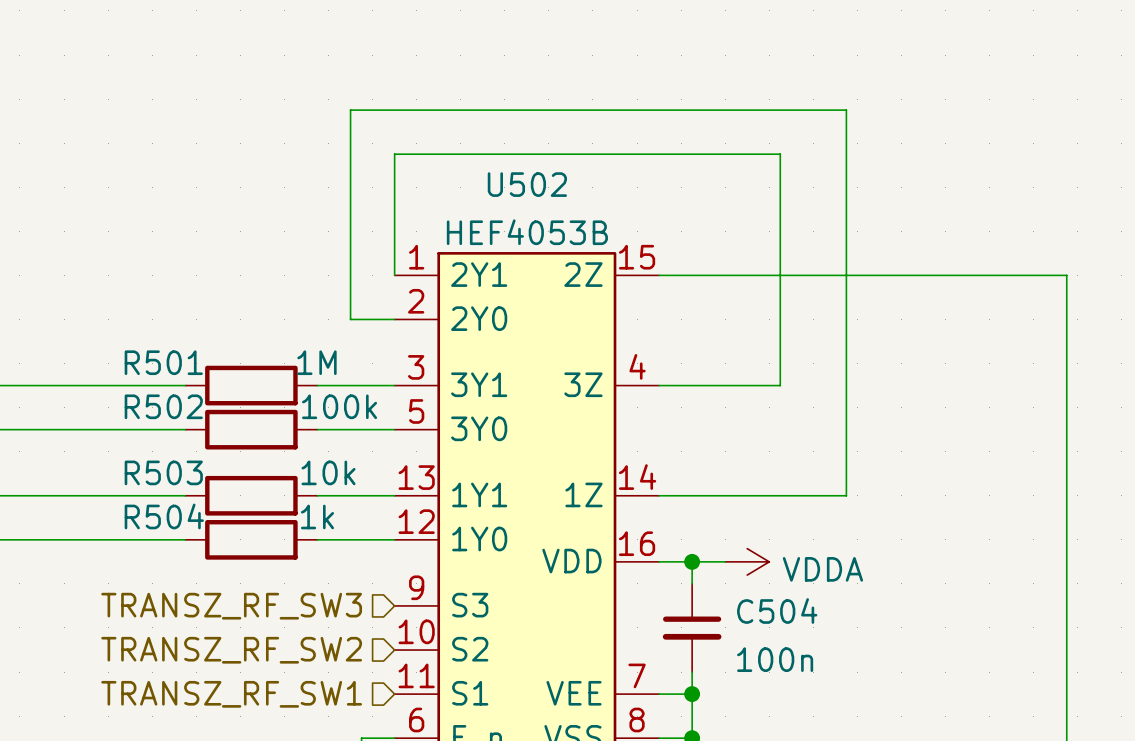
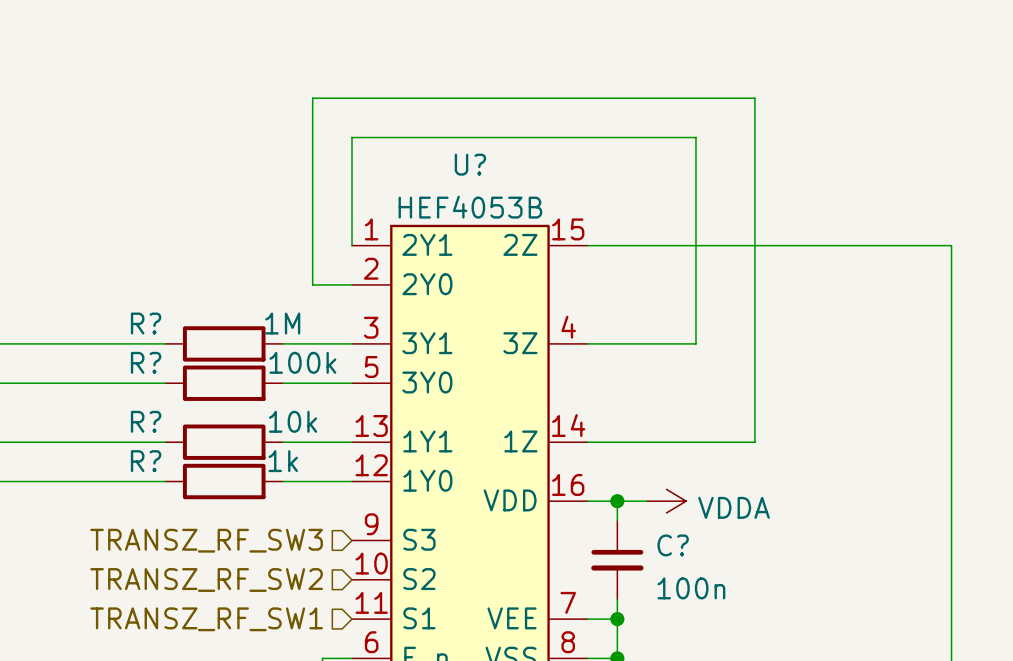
U502 name: U502 (527, 184) -> U? (470, 164)
R501 name: R501 (163, 362) -> R? (146, 323)
R502 name: R502 (163, 406) -> R? (146, 362)
R503 name: R503 (163, 472) -> R? (146, 421)
R504 name: R504 (164, 516) -> R? (146, 461)
C504 name: C504 (777, 610) -> C? (673, 545)

